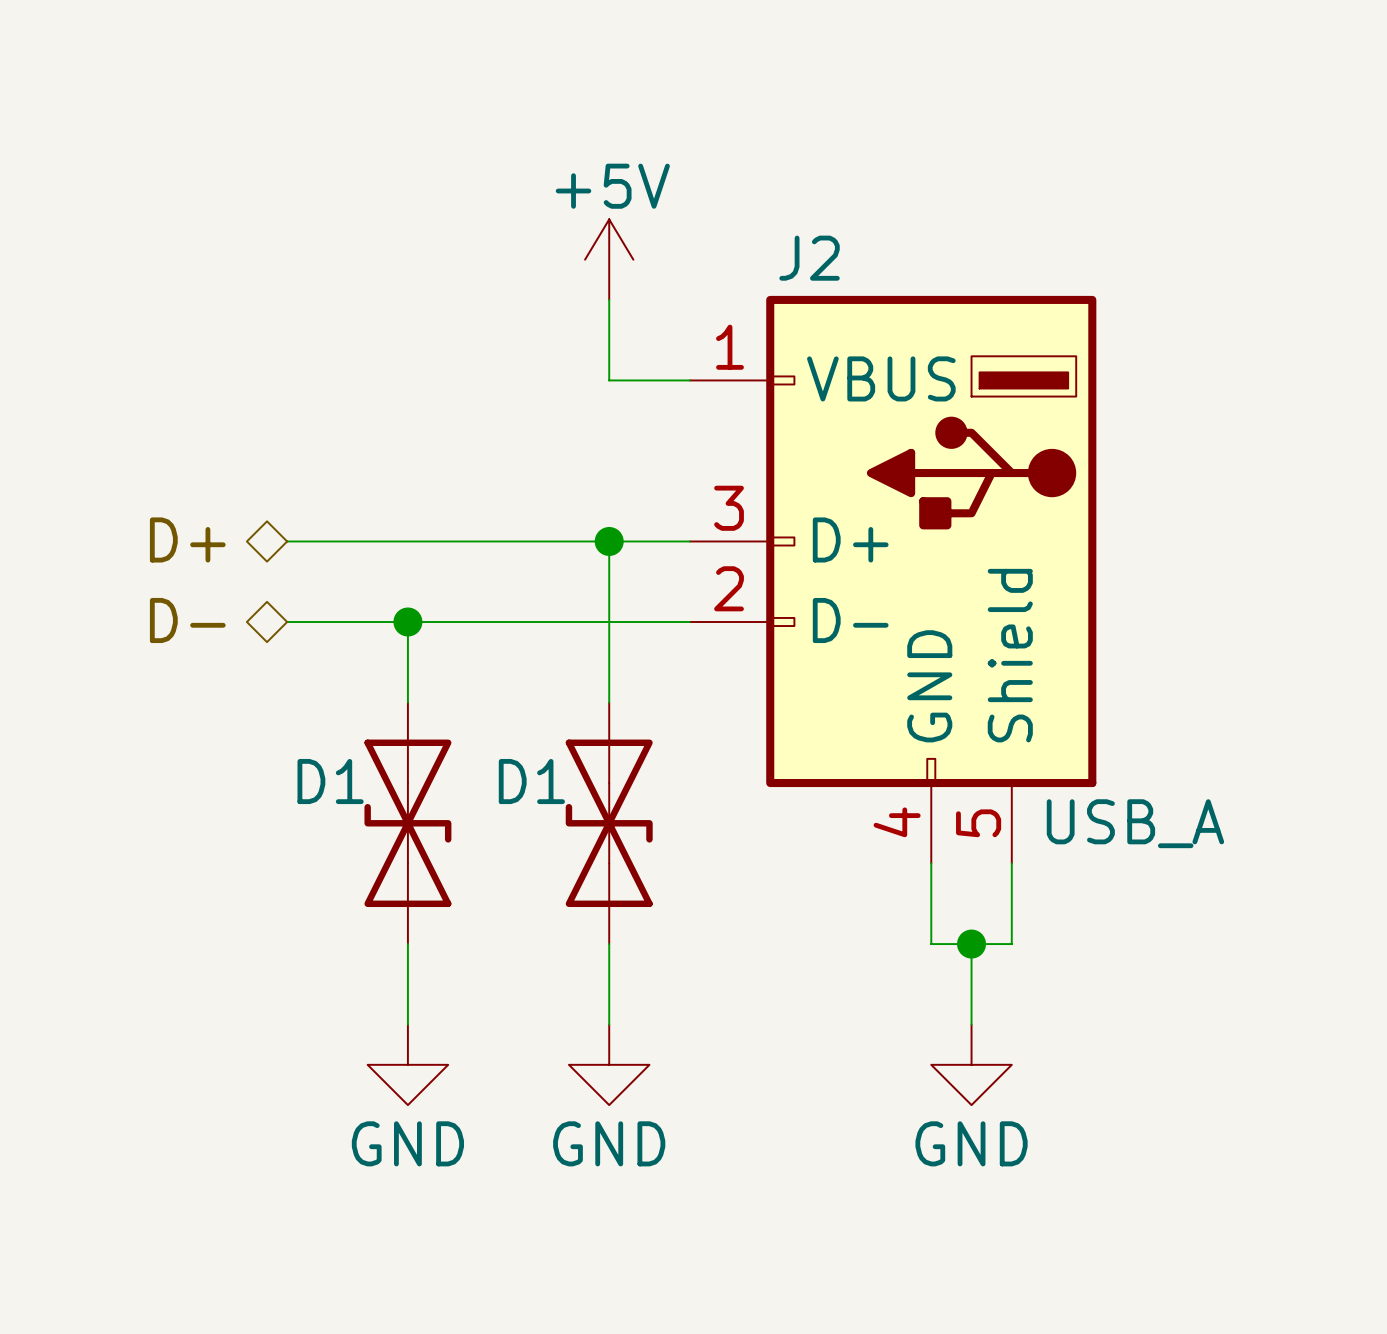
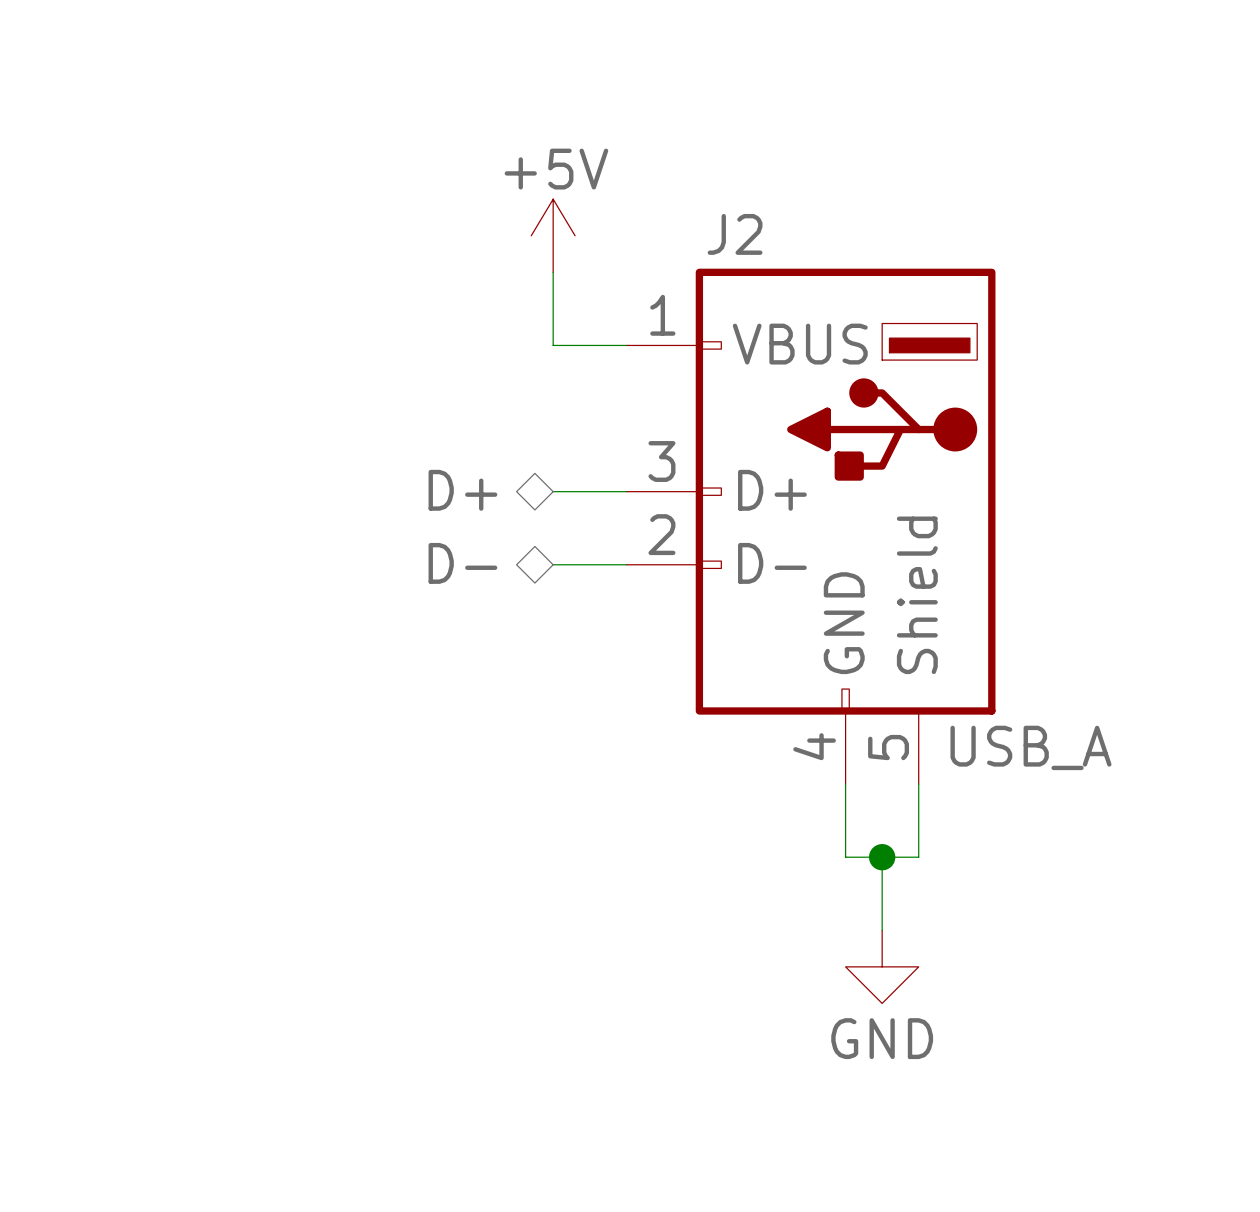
hierarchical label position: D+ (187, 539) -> D+ (462, 490)
wire: (287, 541) (609, 541) (609, 702) -> none
junction: (609, 541) -> none
hierarchical label position: D- (187, 620) -> D- (462, 563)
wire: (287, 621) (609, 621) -> none
wire: (407, 621) (407, 702) -> none
junction: (407, 621) -> none
D1: (407, 823) -> none
D1: (609, 823) -> none
wire: (407, 944) (407, 1024) -> none
wire: (609, 944) (609, 1024) -> none
power symbol: GND (407, 1064) -> none
power symbol: GND (609, 1064) -> none

